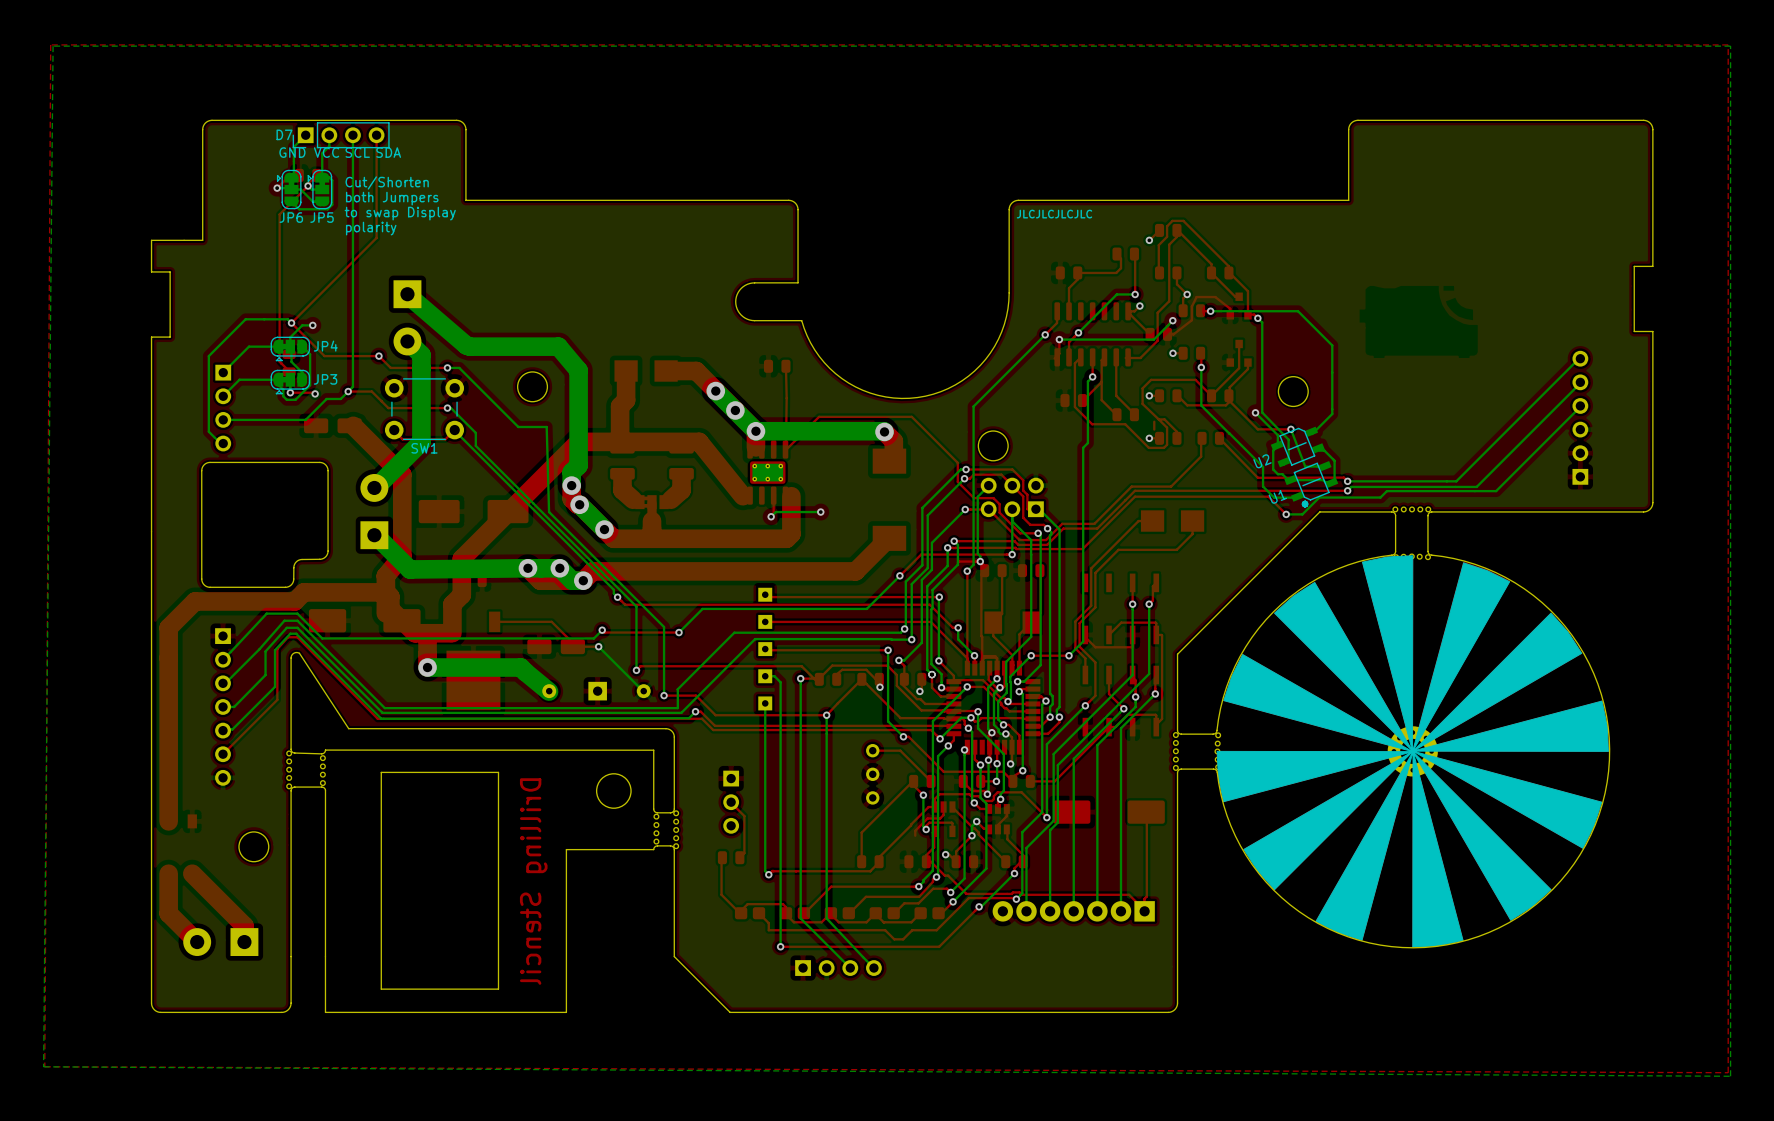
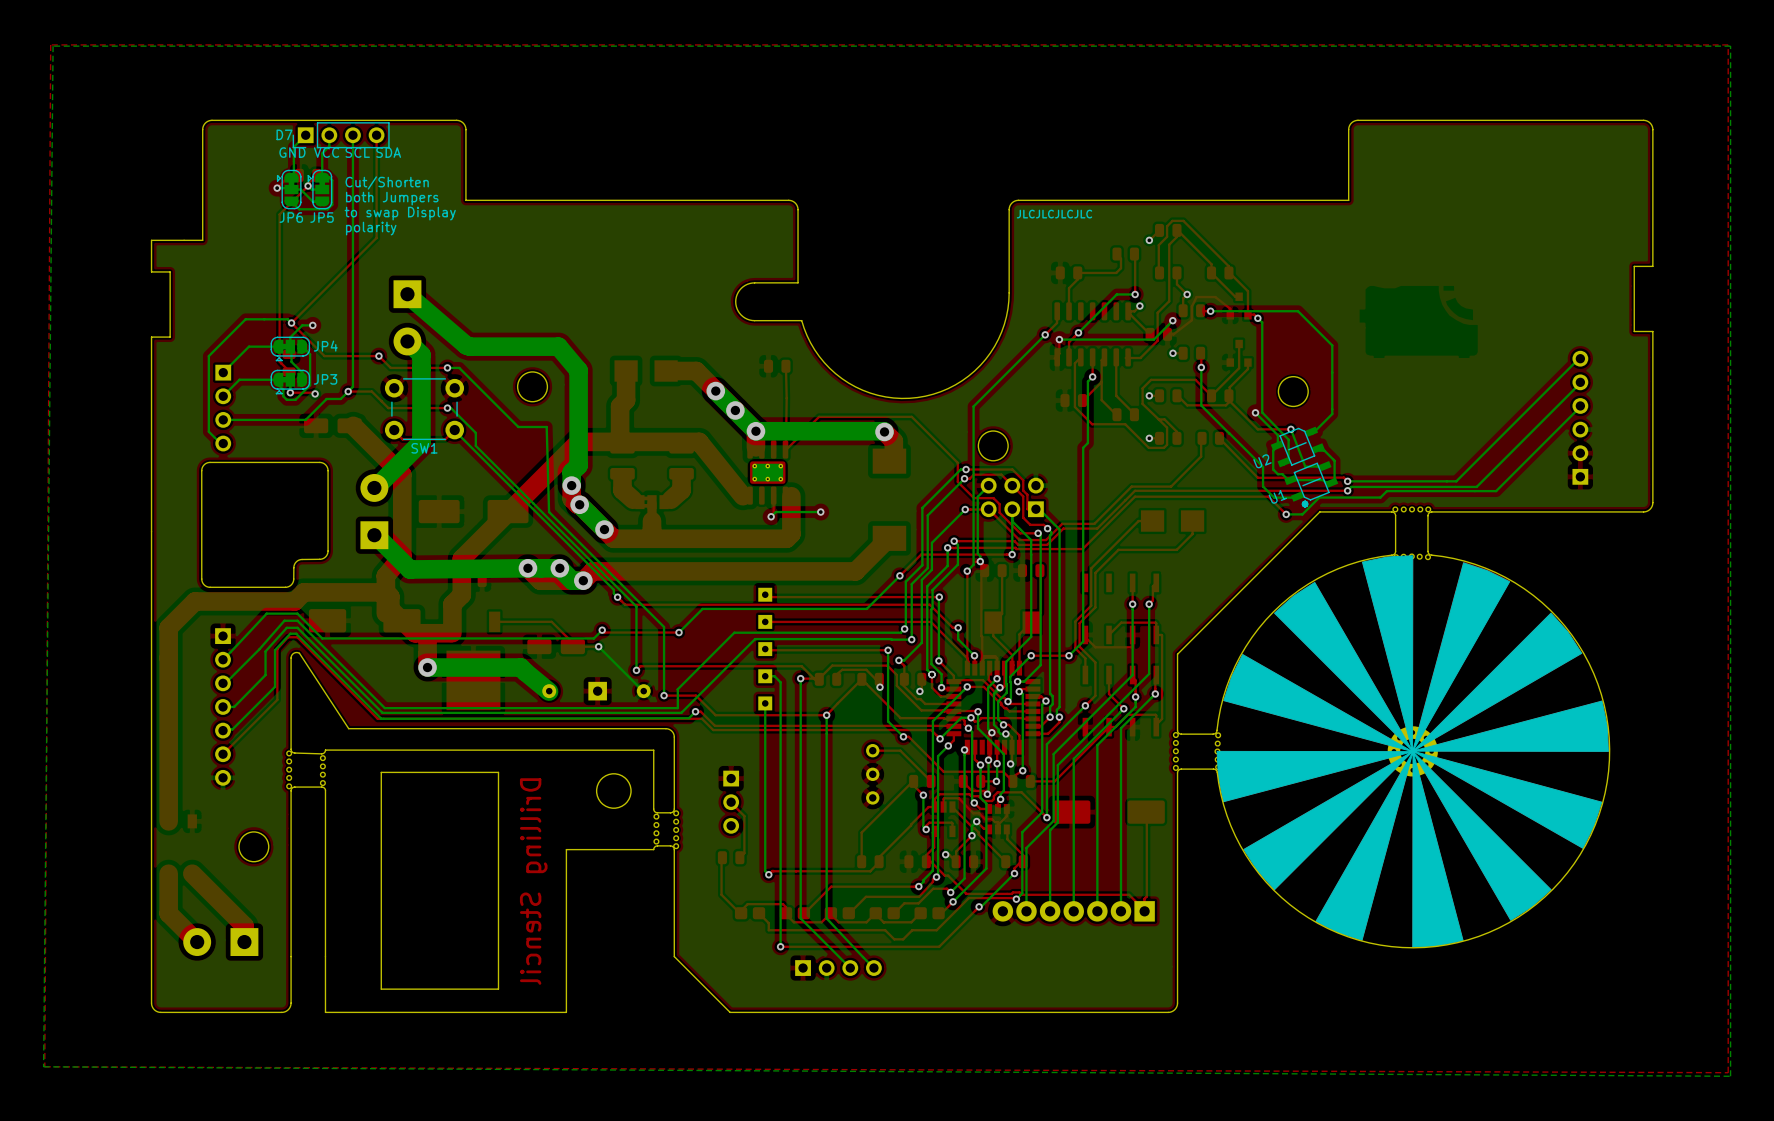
top track: (1154, 421) (1154, 429) -> none
top track: (980, 561) (957, 562) -> none
top track: (943, 807) (943, 815) (940, 818) (927, 818) (915, 830) (915, 835) -> (943, 807) (944, 798) (958, 798) (973, 813) (979, 813) (984, 819) (992, 819) (997, 822) (997, 825)

